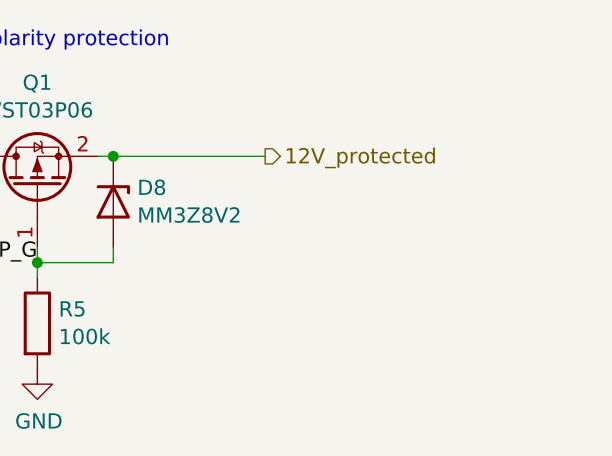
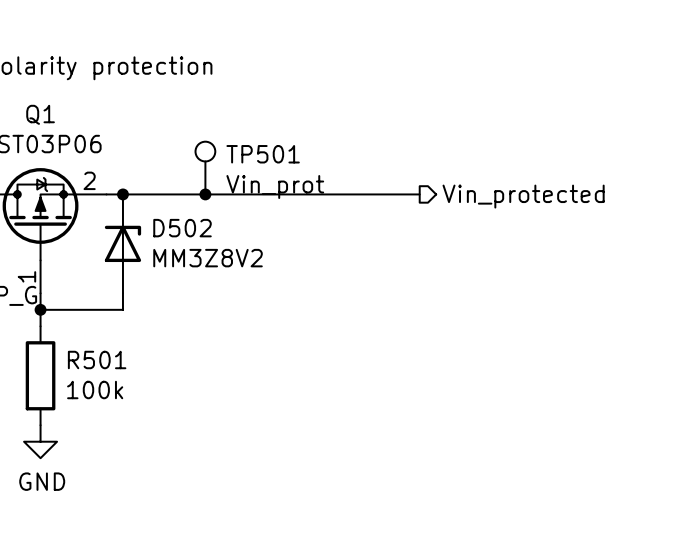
TP501: none -> Vin_prot (205, 168)
junction: none -> (205, 194)
wire: none -> (287, 194) (419, 194)
hierarchical label: 12V_protected (360, 157) -> Vin_protected (523, 196)
D8 name: D8 (152, 187) -> D502 (182, 228)
R5 name: R5 (72, 309) -> R501 (97, 359)

